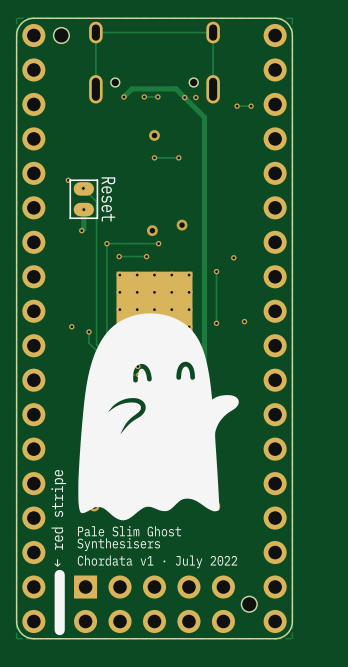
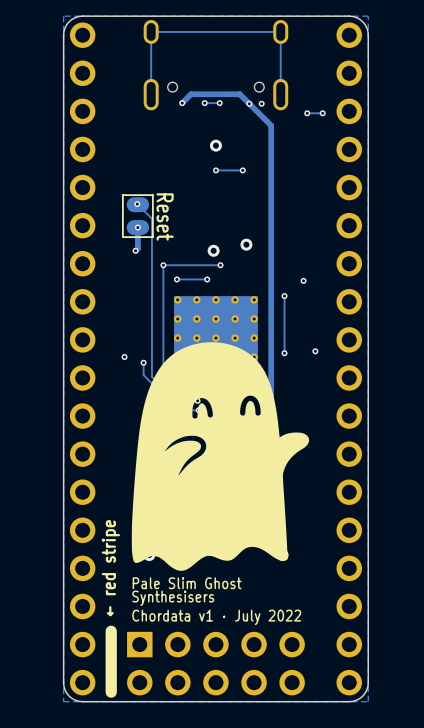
part: (61, 35) -> none
via: (68, 180) -> none
part: (249, 604) -> none

